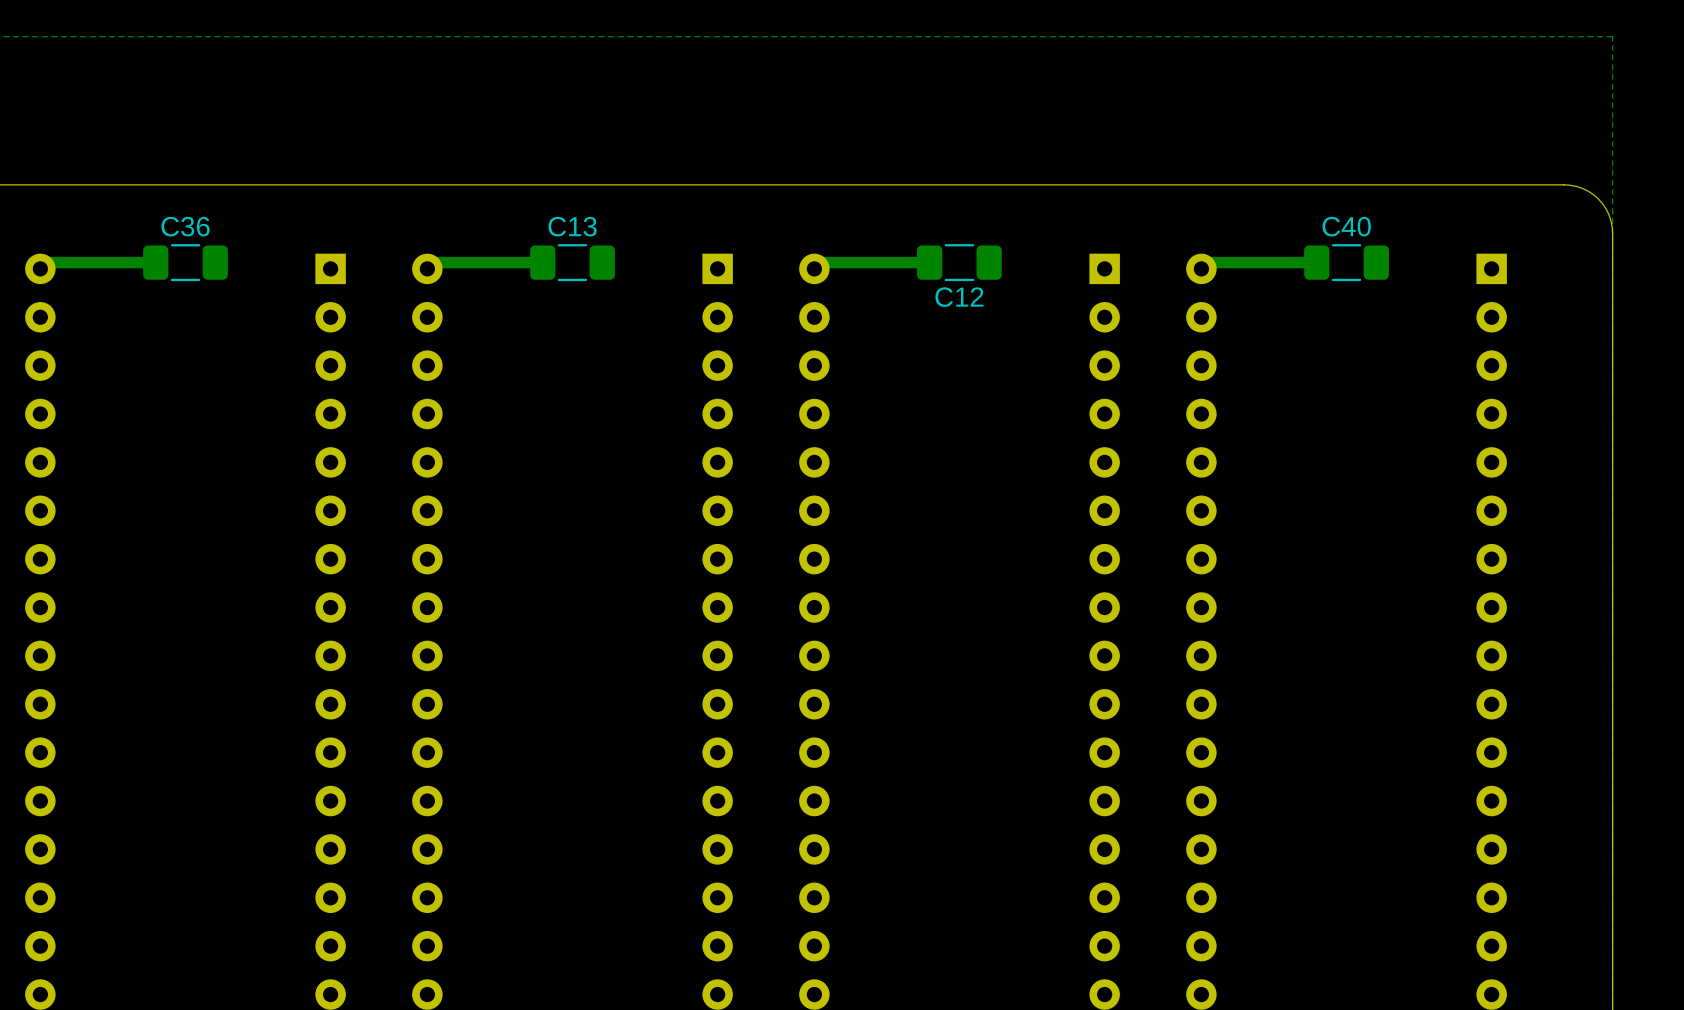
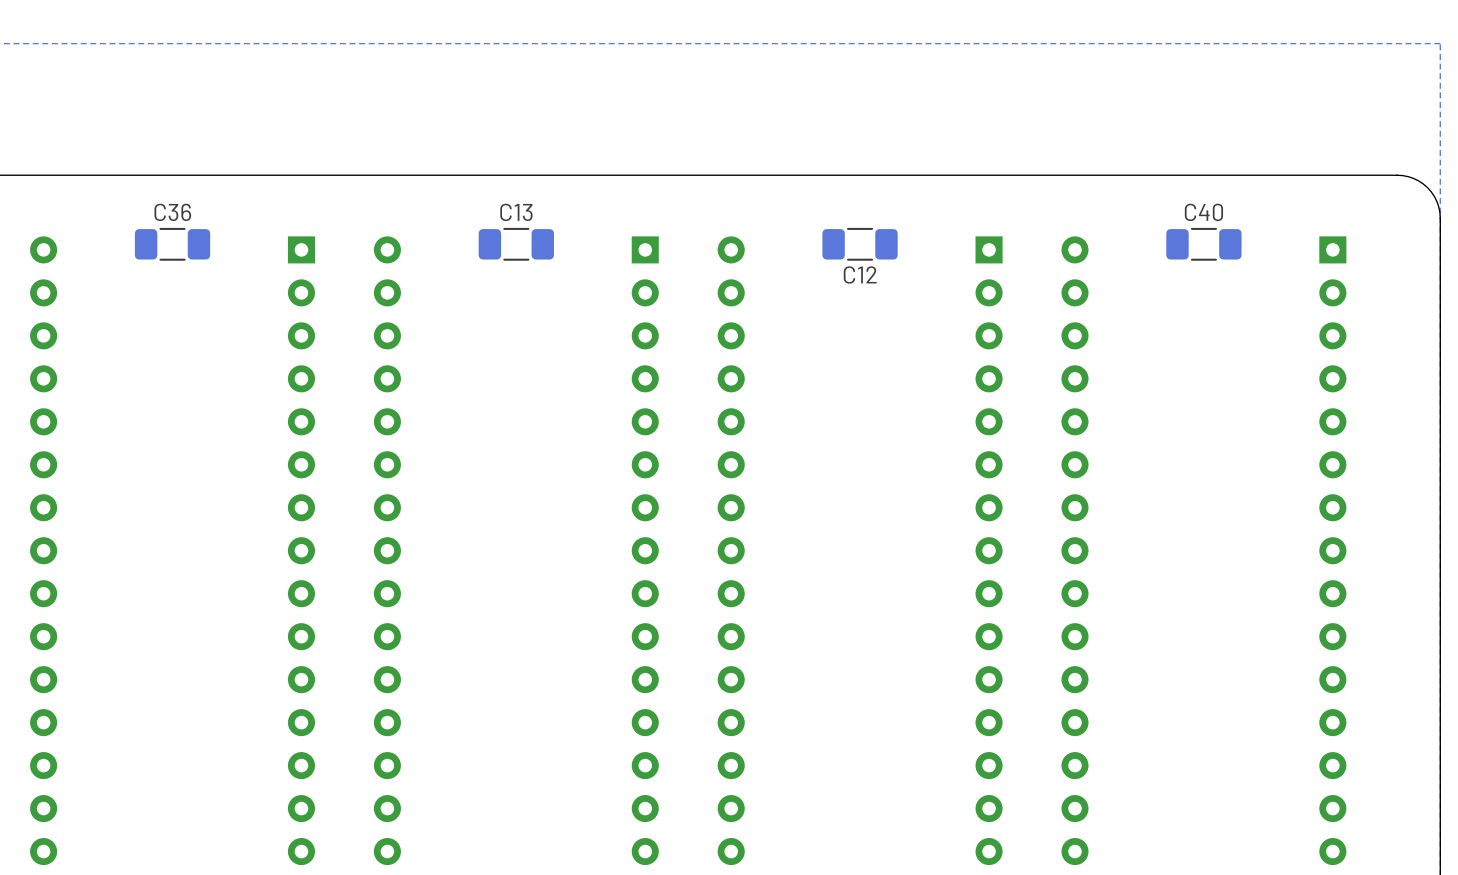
track: (155, 262) (46, 262) (40, 268) -> none
track: (542, 262) (433, 262) (427, 268) -> none
track: (929, 262) (820, 262) (814, 268) -> none
track: (1316, 262) (1207, 262) (1201, 268) -> none

